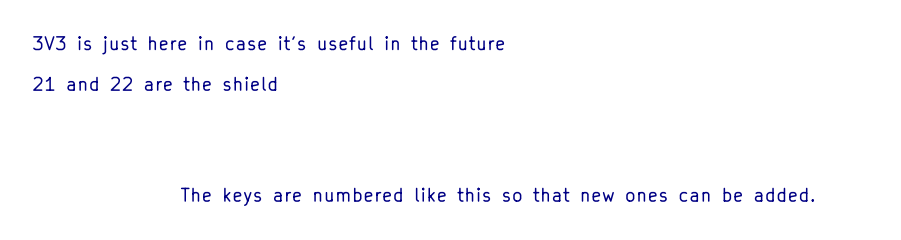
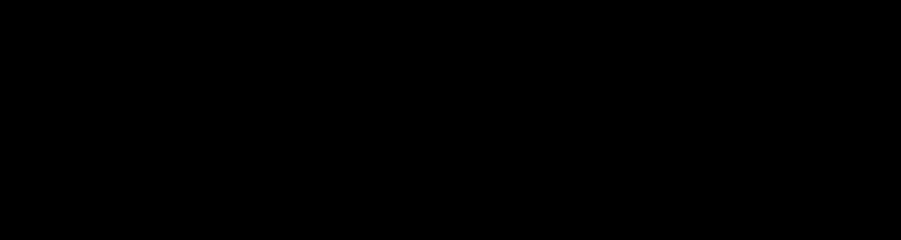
text: 3V3 is just here in case it's useful in the future (268, 45) -> none
text: 21 and 22 are the shield (154, 83) -> none
text: The keys are numbered like this so that new ones can be added. (497, 196) -> none

